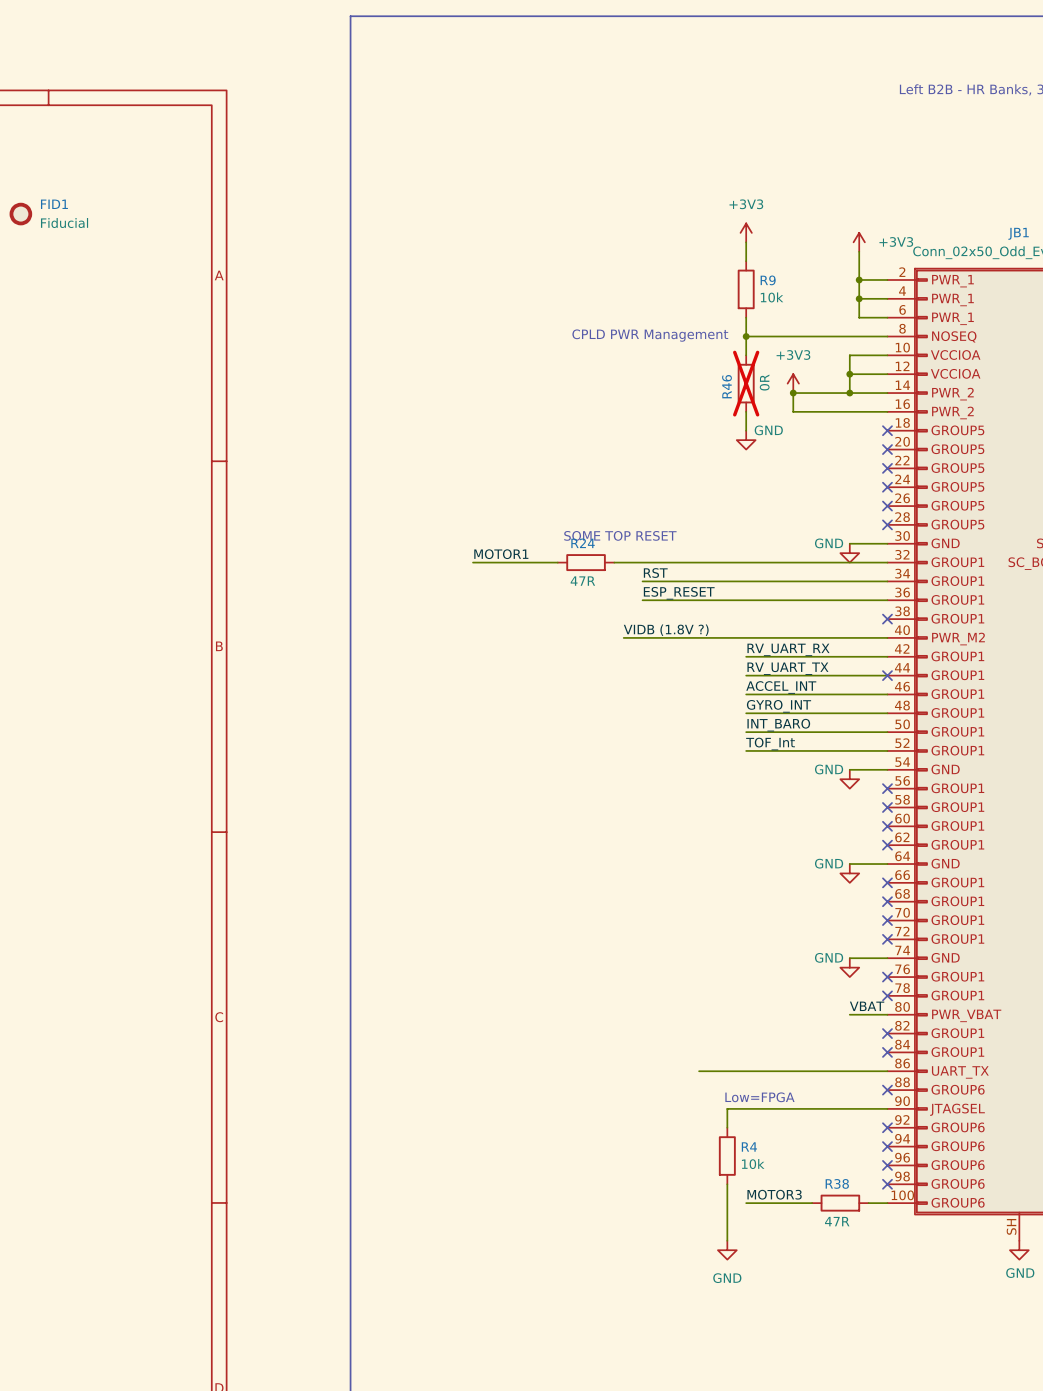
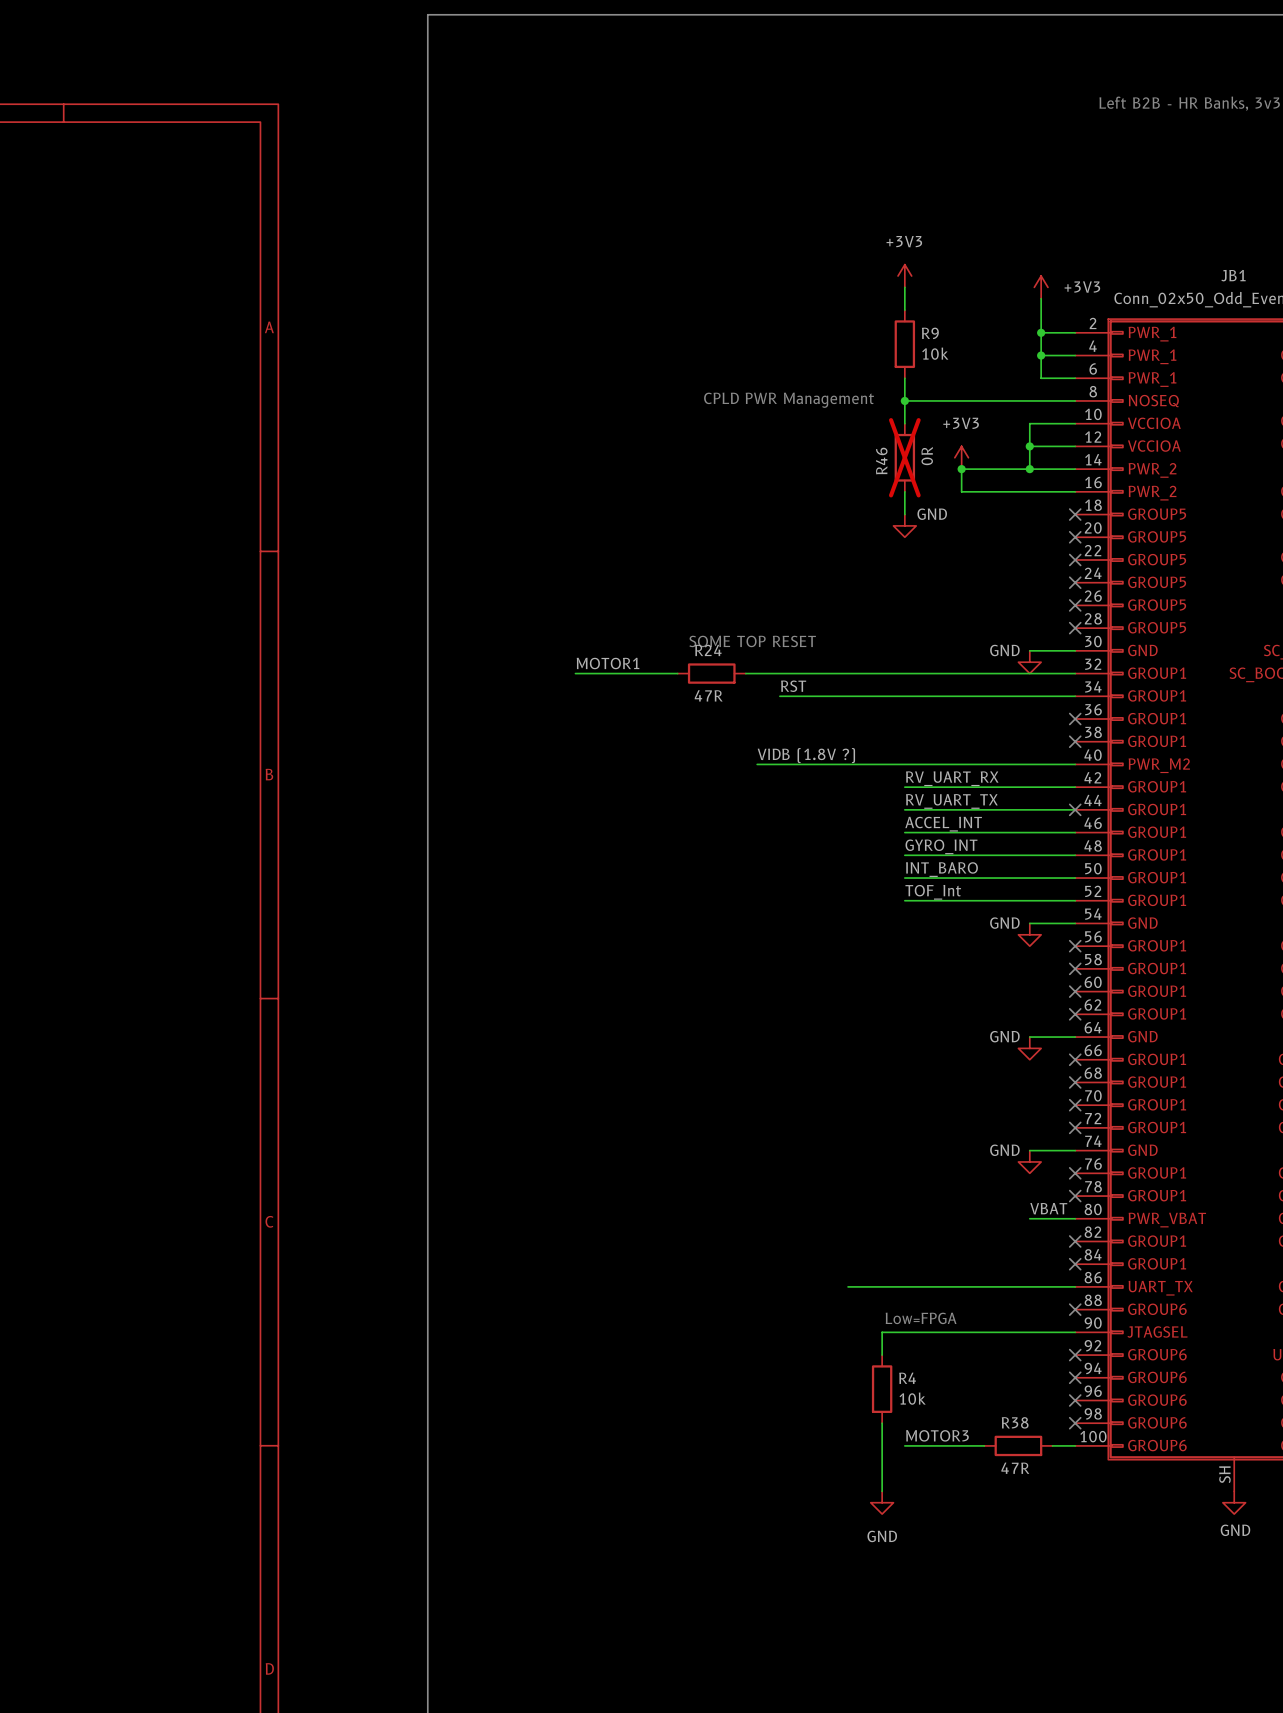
FID1: Fiducial (20, 214) -> none
label: ESP_RESET (679, 593) -> none
wire: (642, 600) (887, 600) -> none
no-connect mark: none -> (1075, 719)

